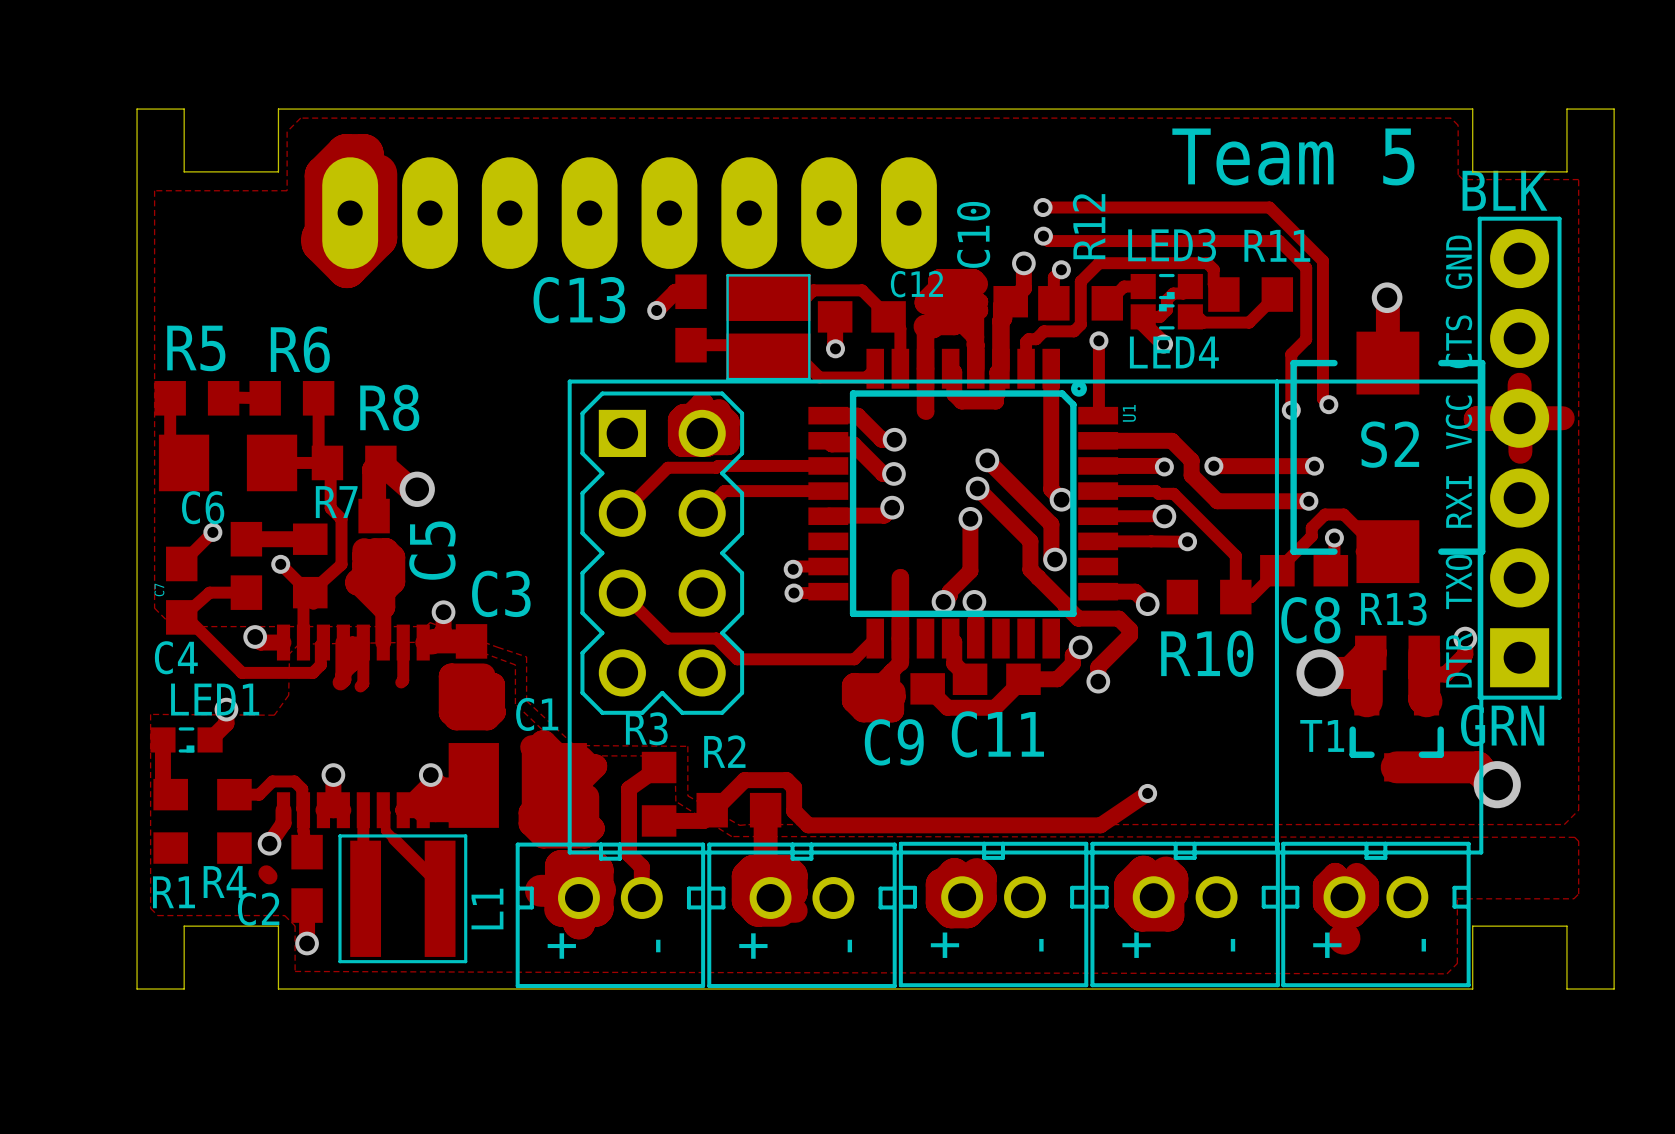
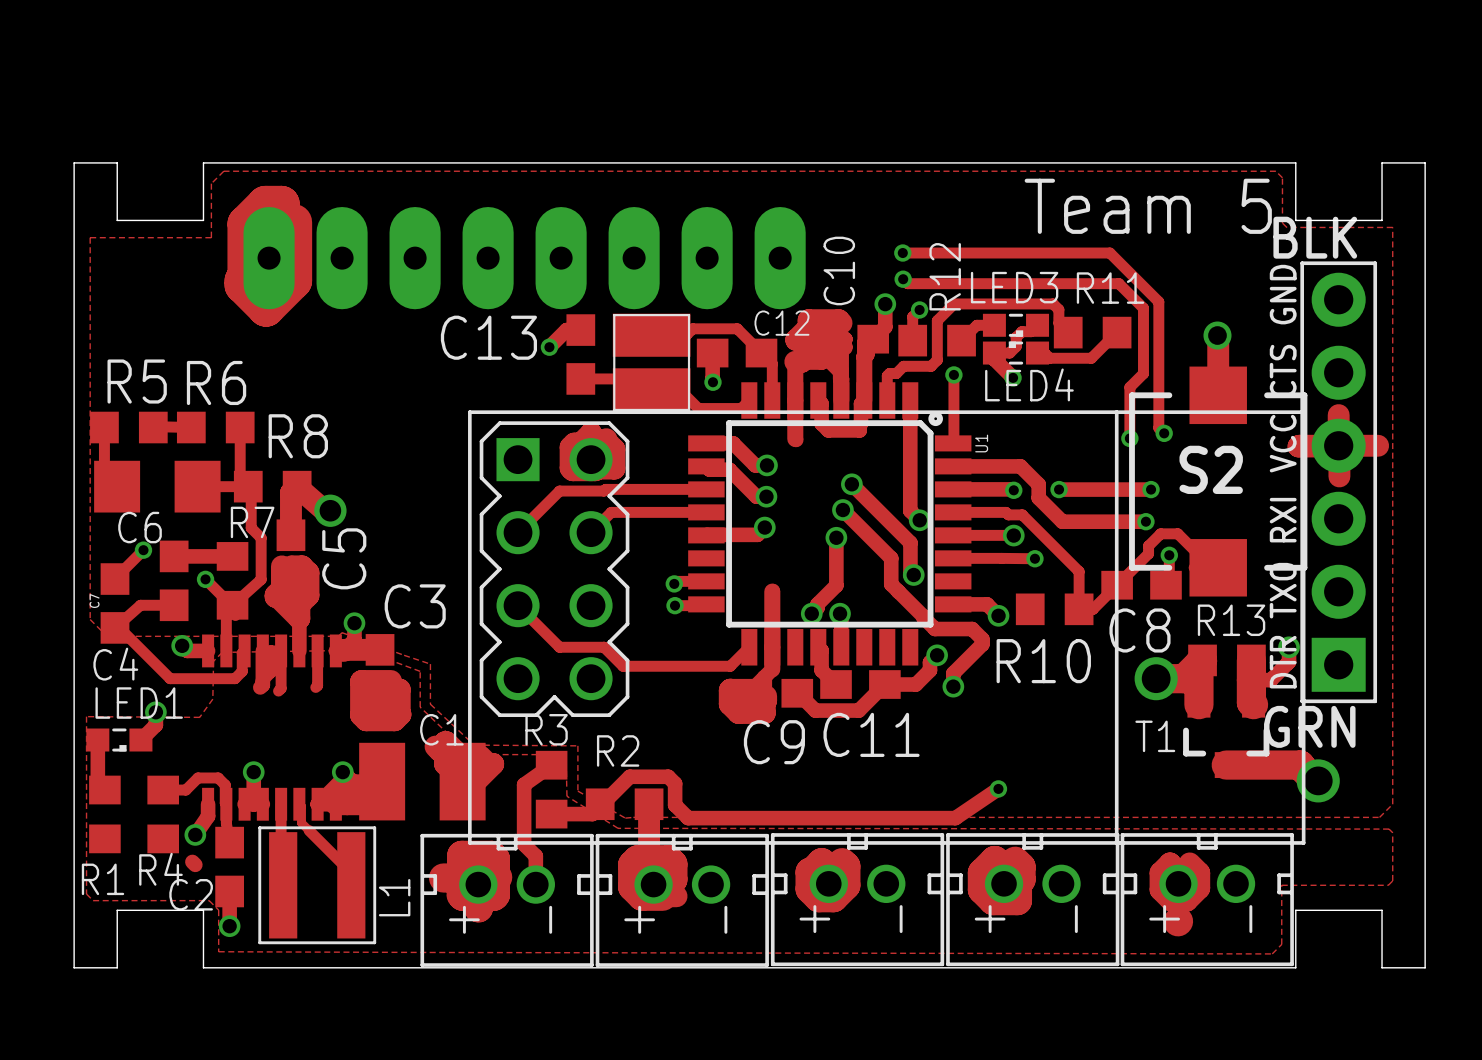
C1 name position: C1 (537, 714) -> C1 (441, 729)
track: (533, 748) (533, 809) (530, 812) (530, 823) (543, 836) (584, 836) (592, 828) (587, 822) (587, 796) -> none

